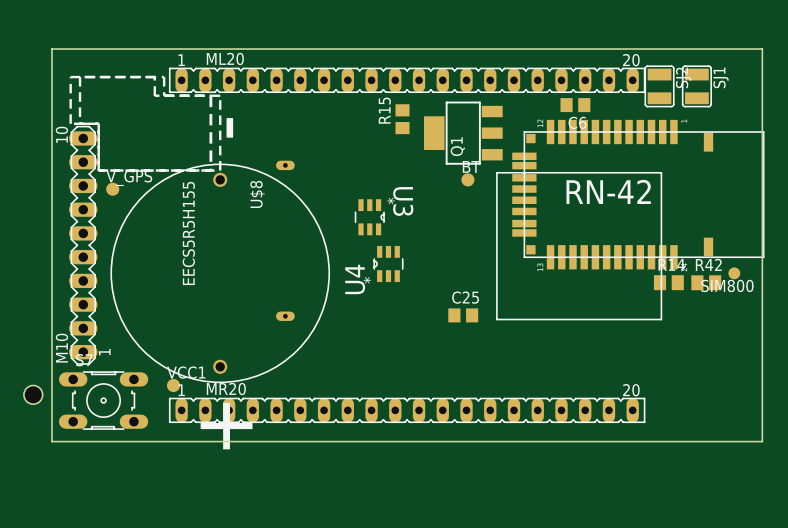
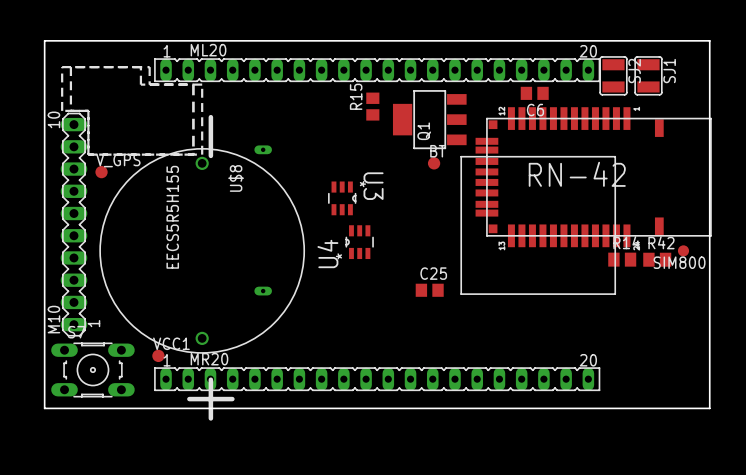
hole: (33, 394) -> none

